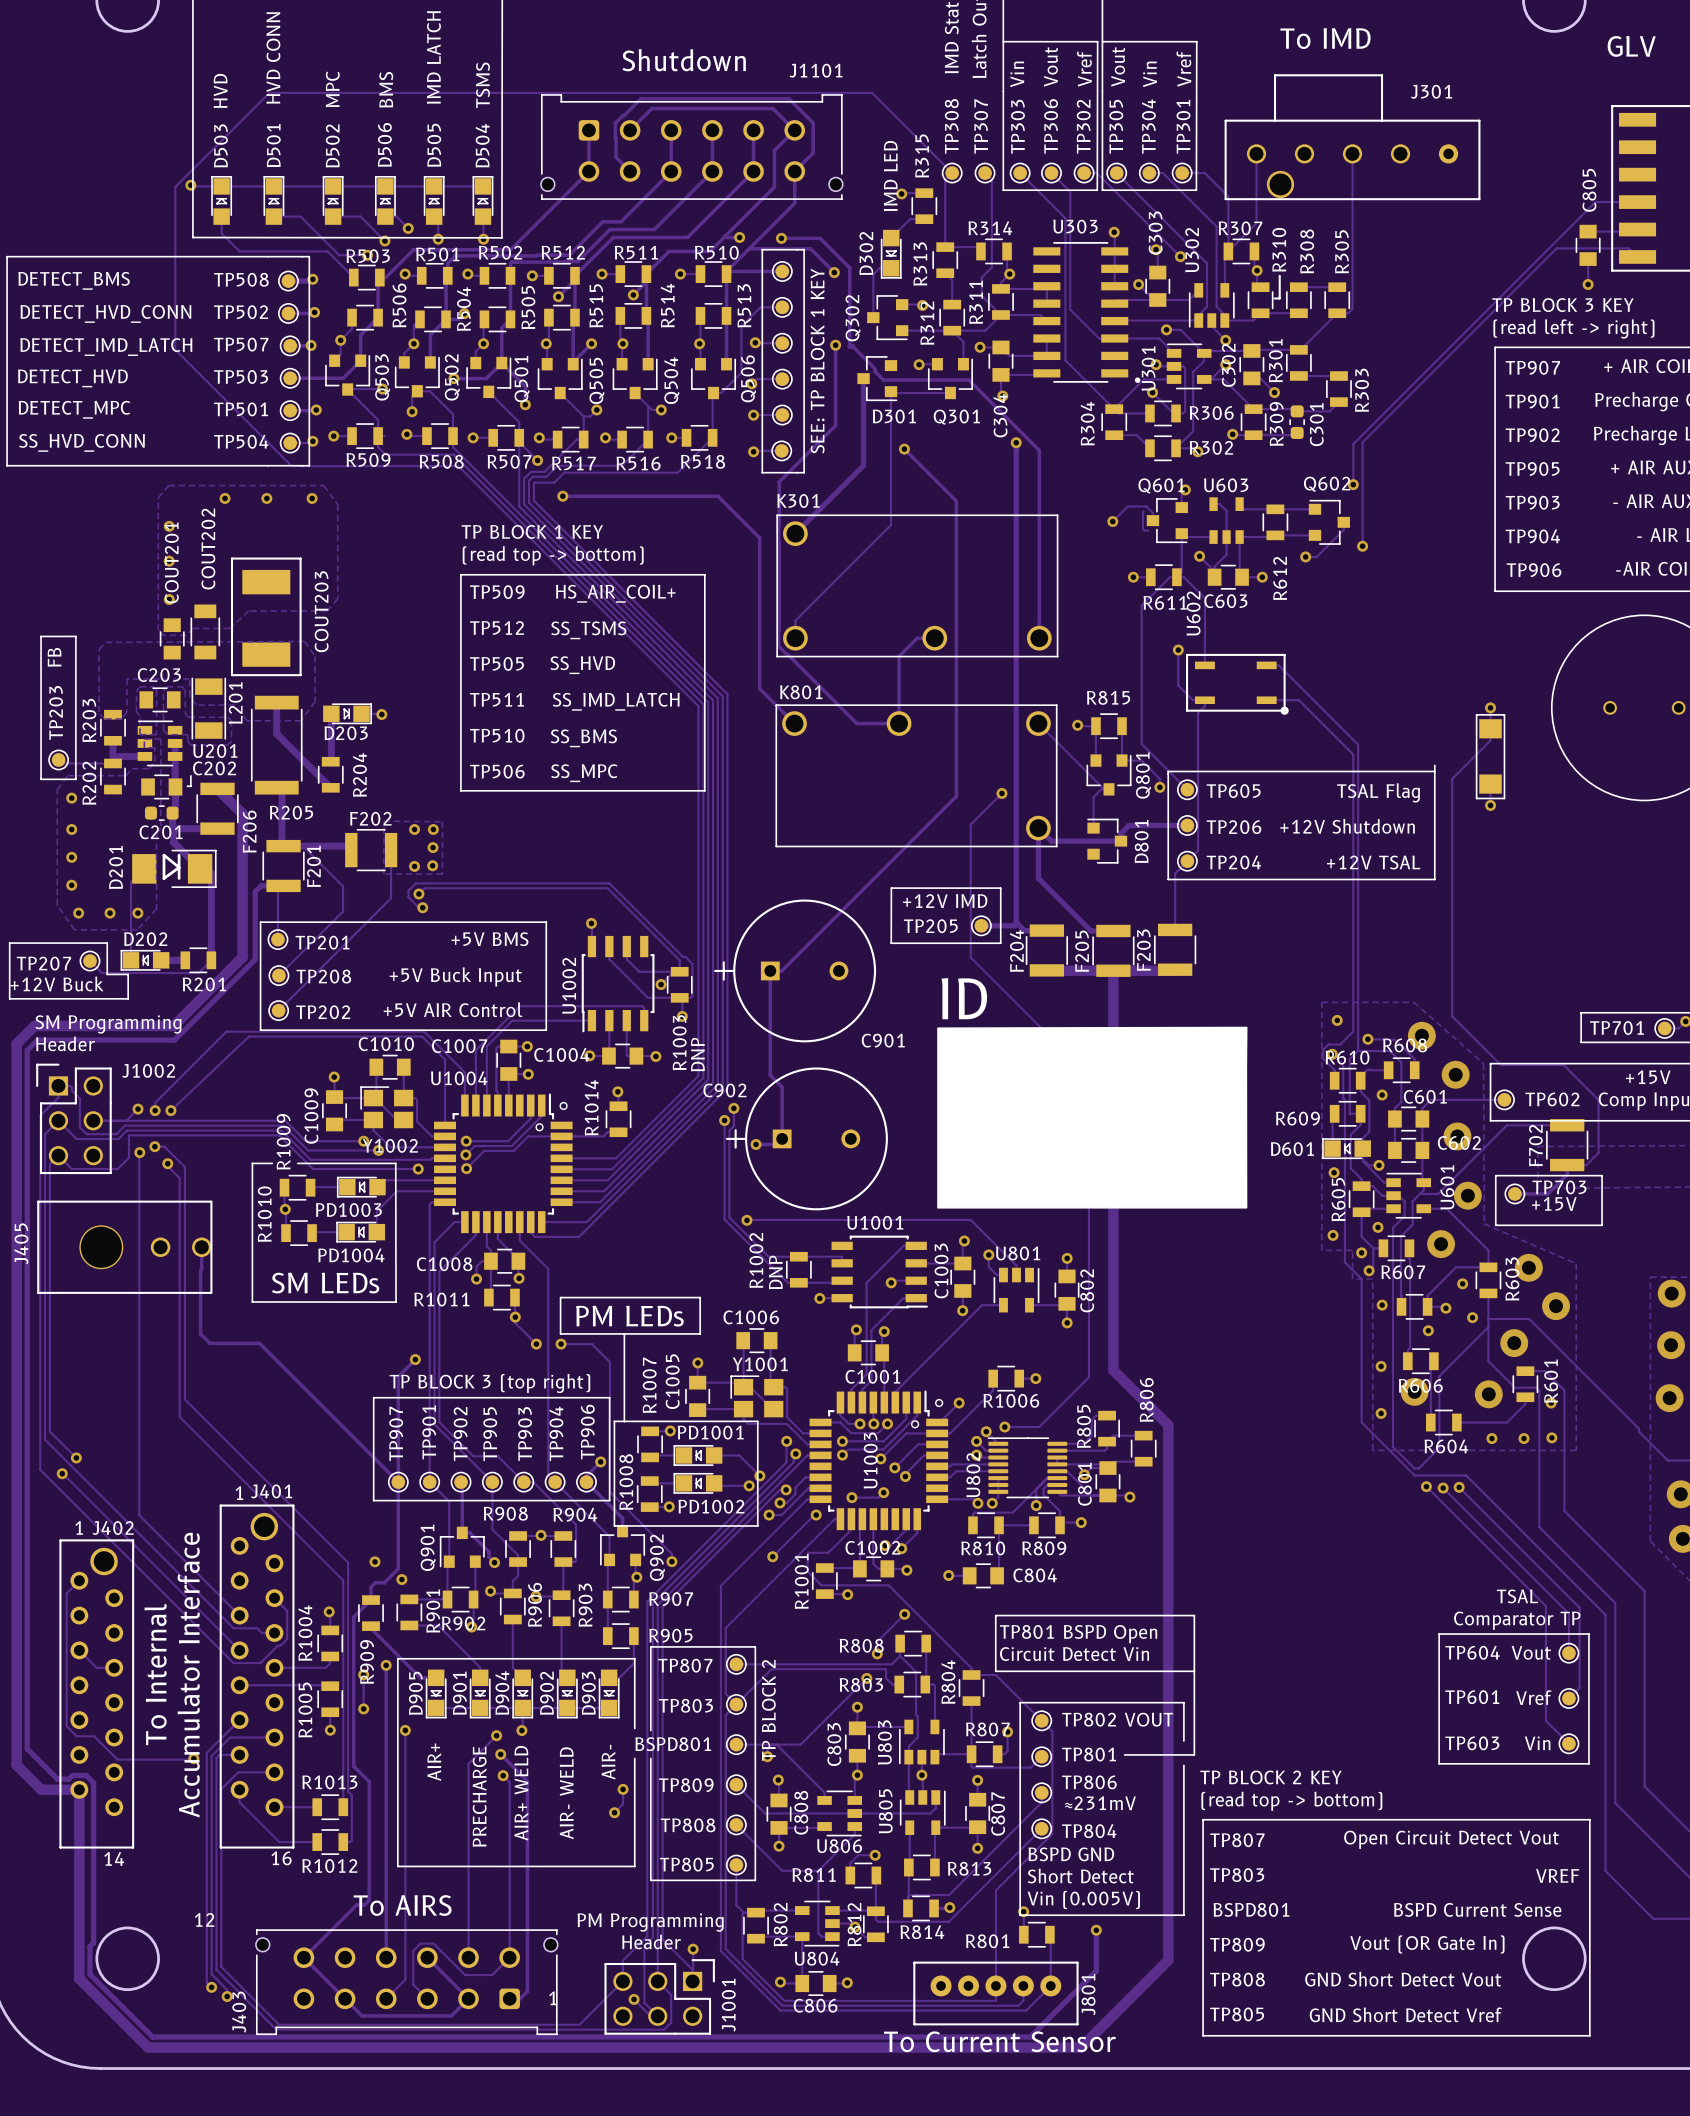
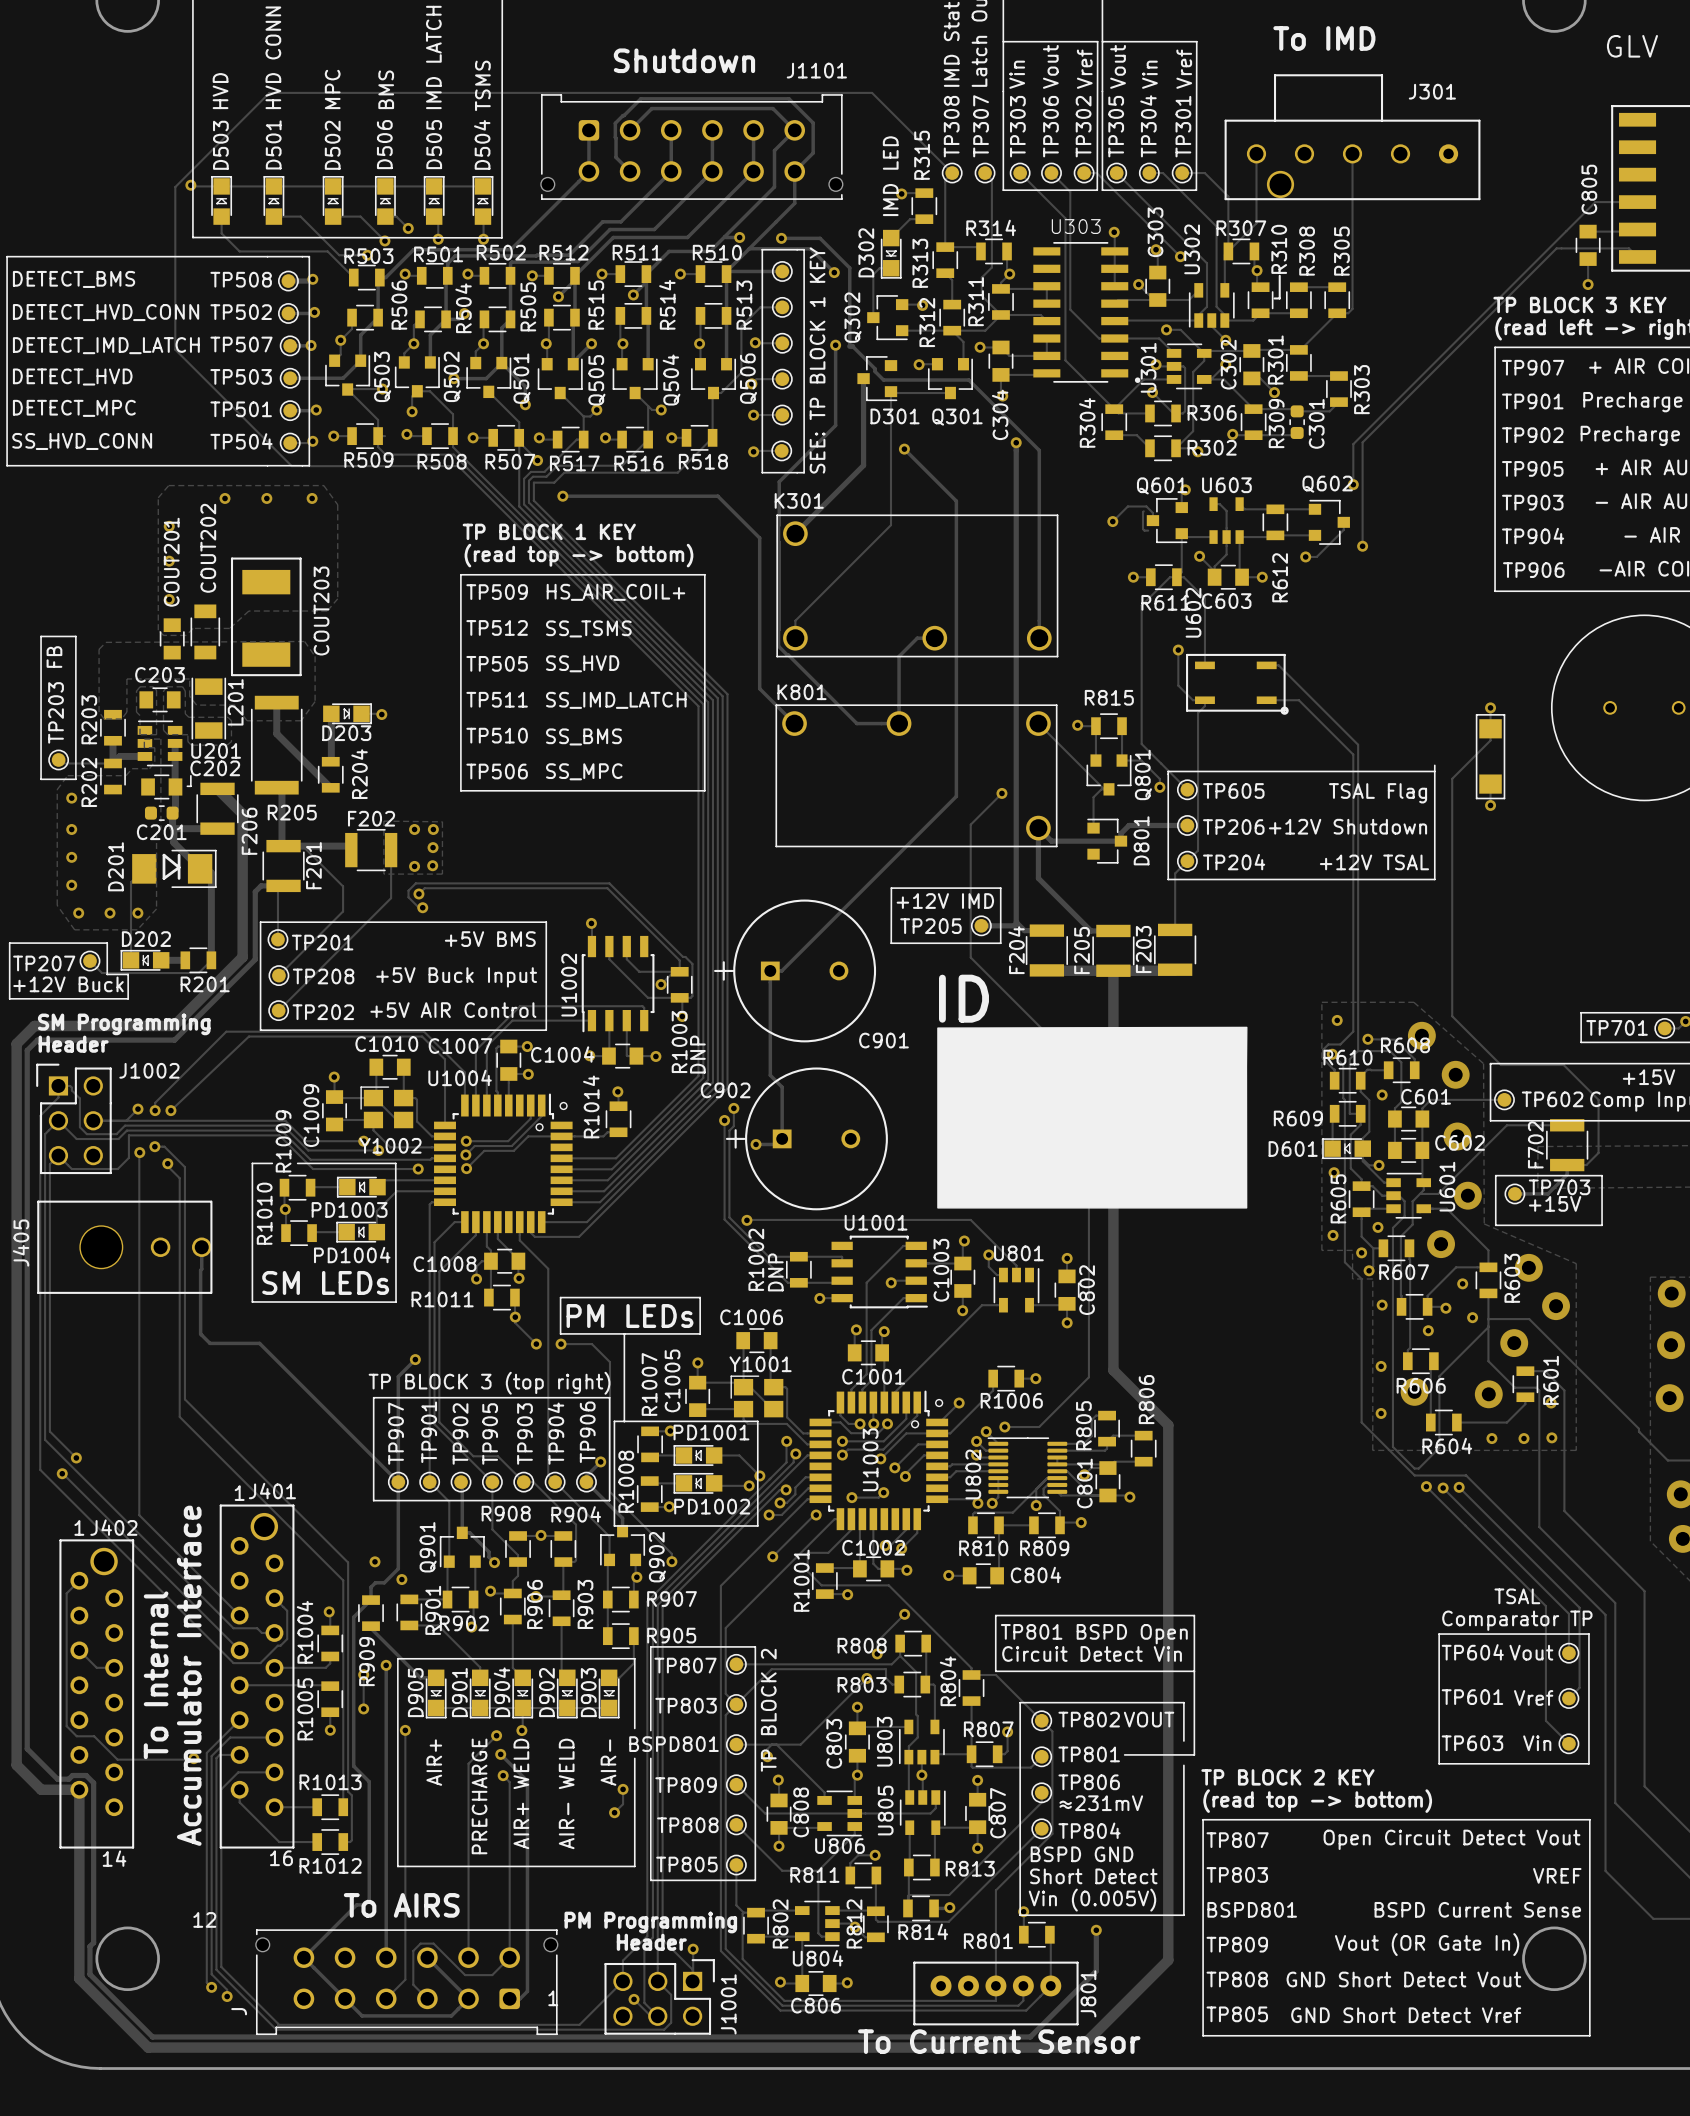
J403 name: J403 (239, 2012) -> J (239, 2011)

